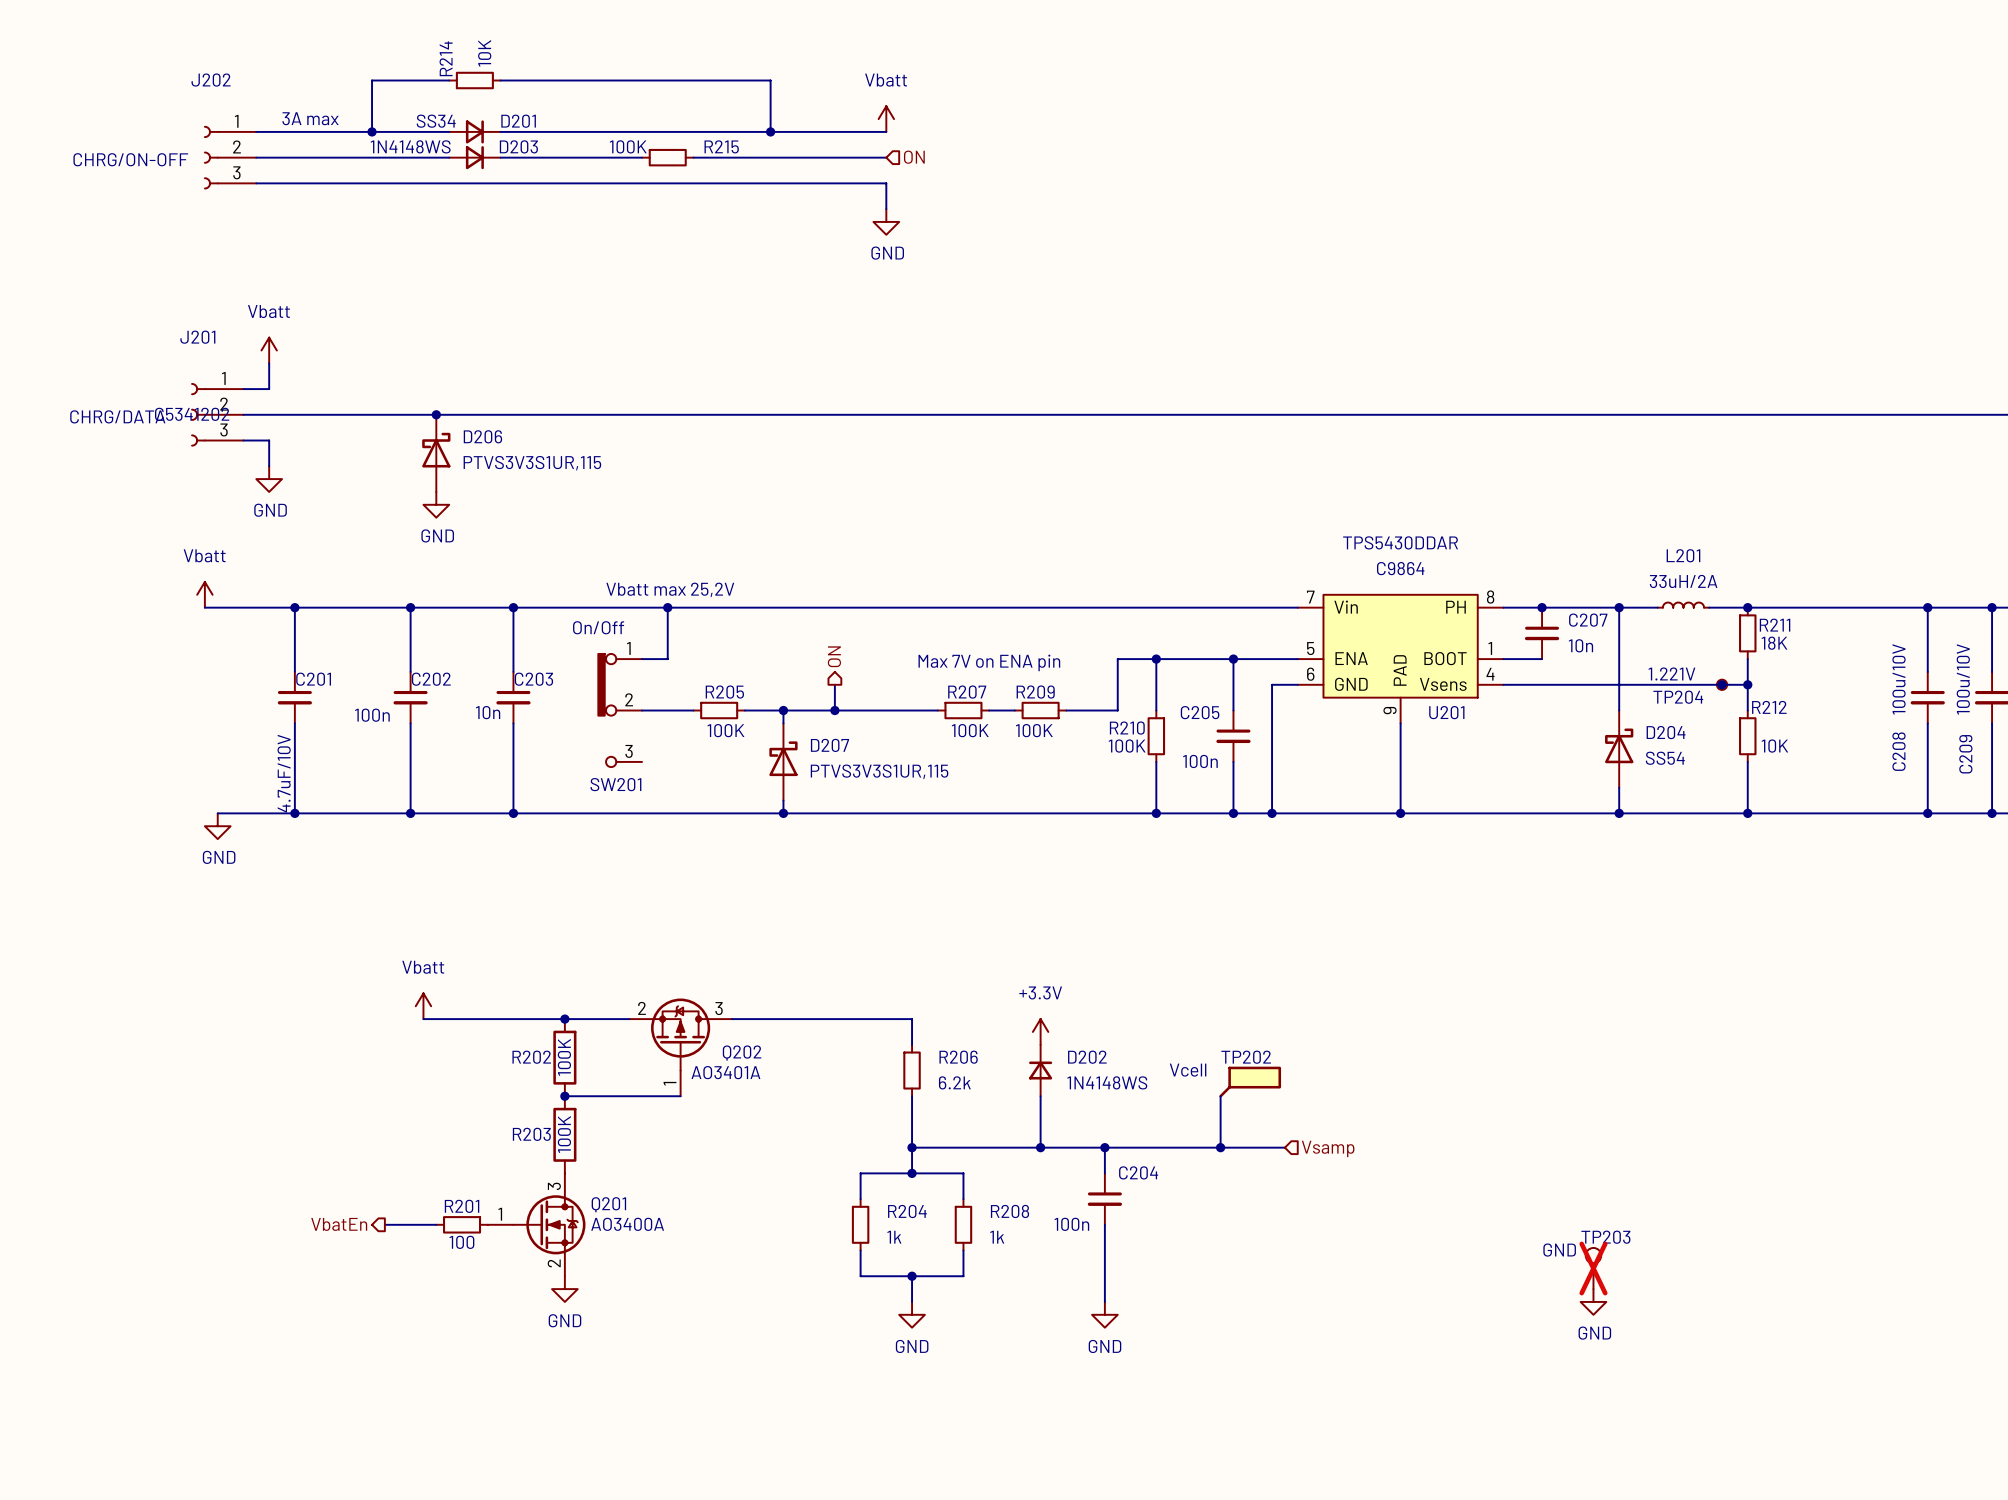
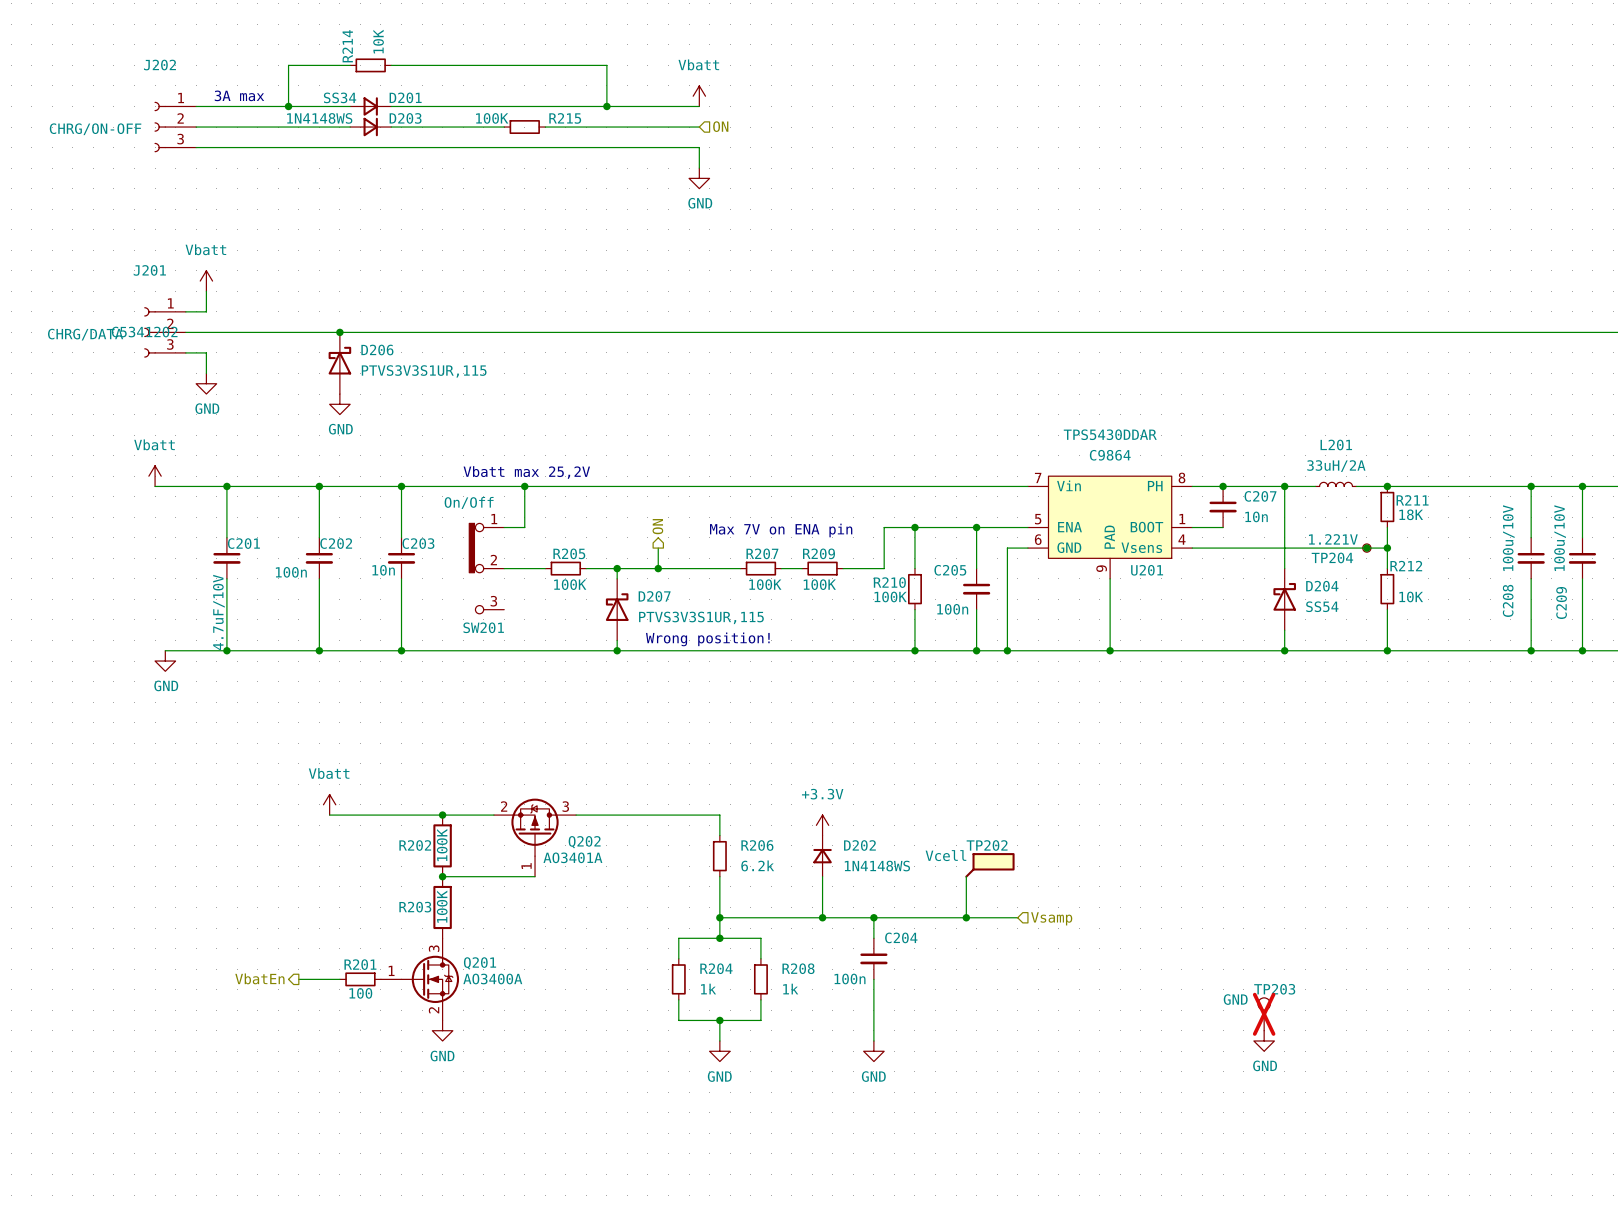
text: none -> Wrong position! (707, 639)

